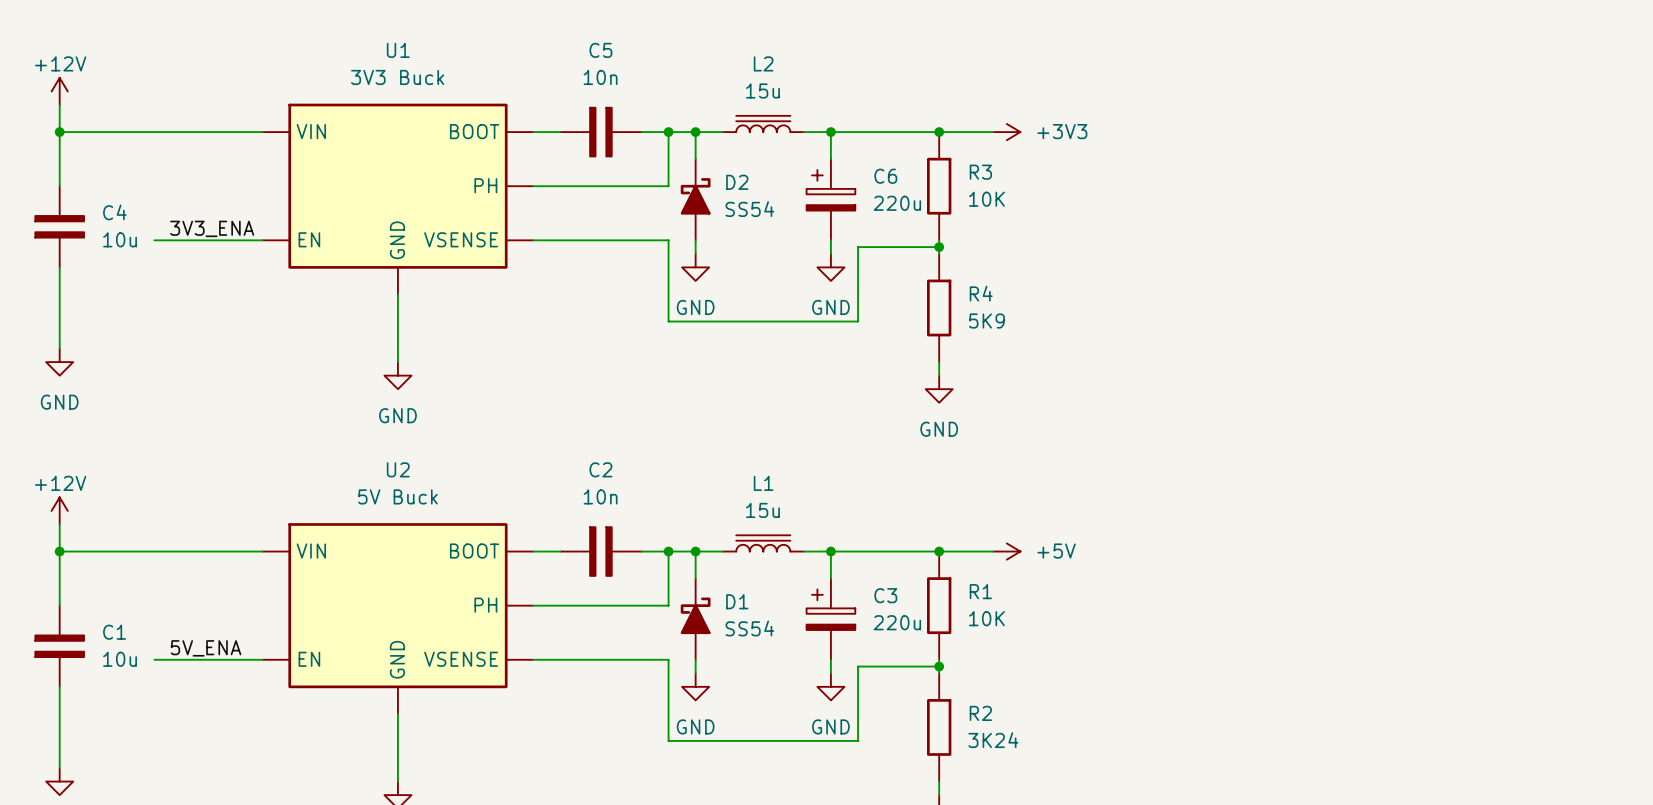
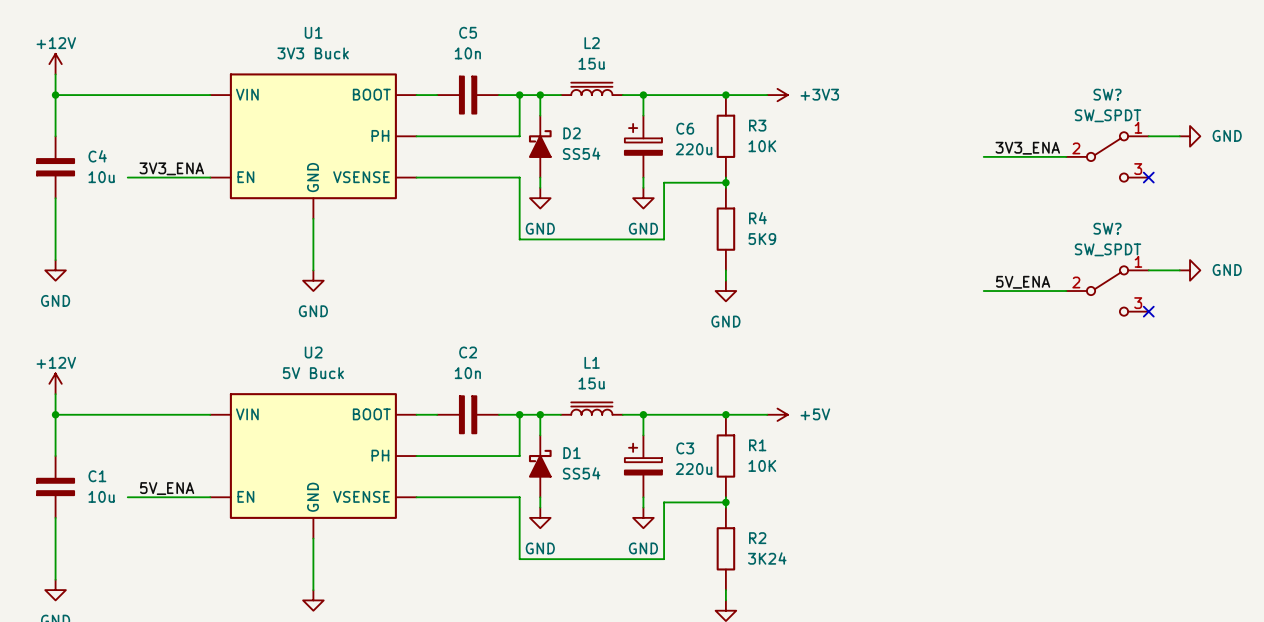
wire: none -> (1148, 136) (1179, 136)
power symbol: none -> GND (1190, 136)
label: none -> 3V3_ENA (1027, 148)
wire: none -> (983, 156) (1066, 156)
SW?: none -> SW_SPDT (1107, 156)
no-connect mark: none -> (1148, 177)
wire: none -> (1148, 270) (1179, 270)
power symbol: none -> GND (1190, 270)
label: none -> 5V_ENA (1023, 282)
wire: none -> (983, 291) (1066, 291)
SW?: none -> SW_SPDT (1107, 291)
no-connect mark: none -> (1148, 311)

